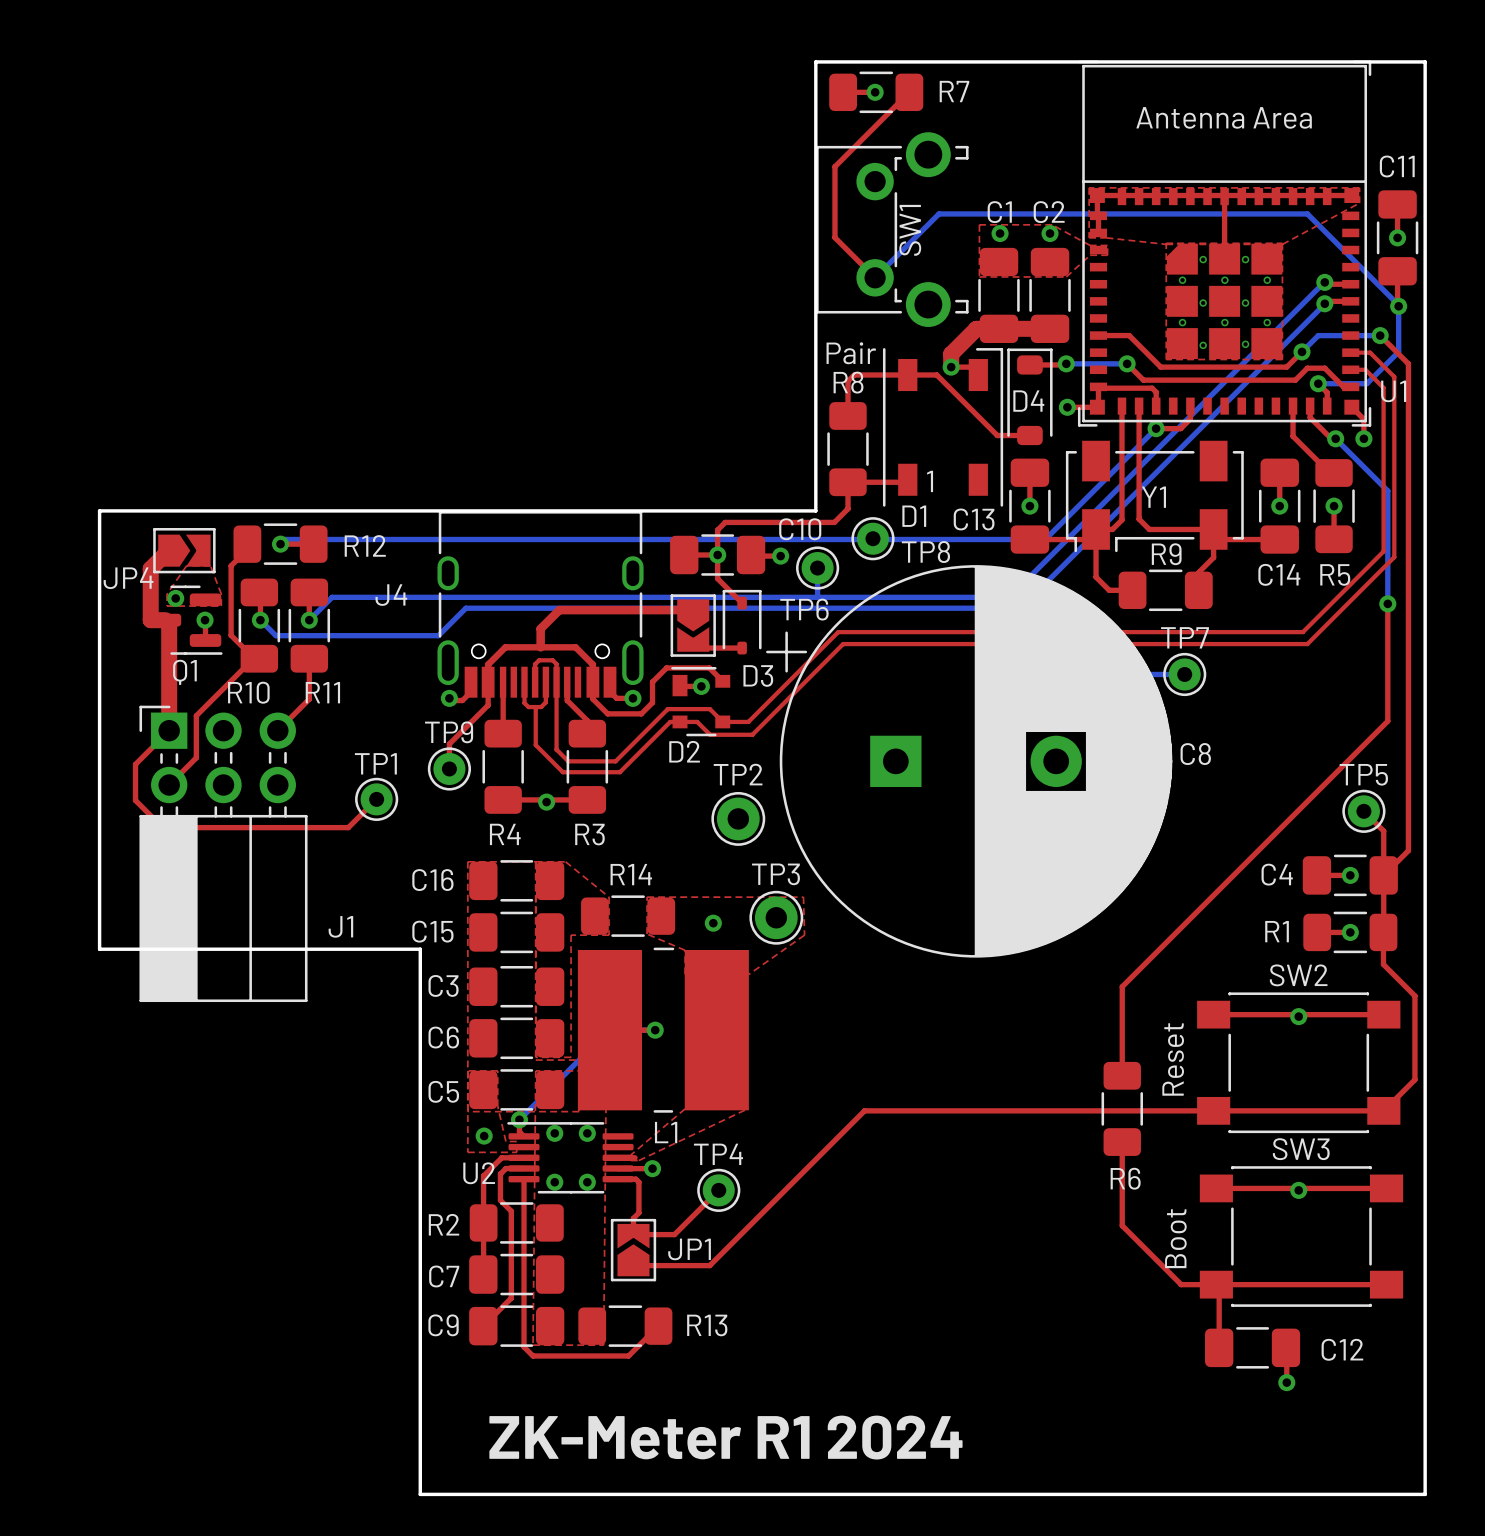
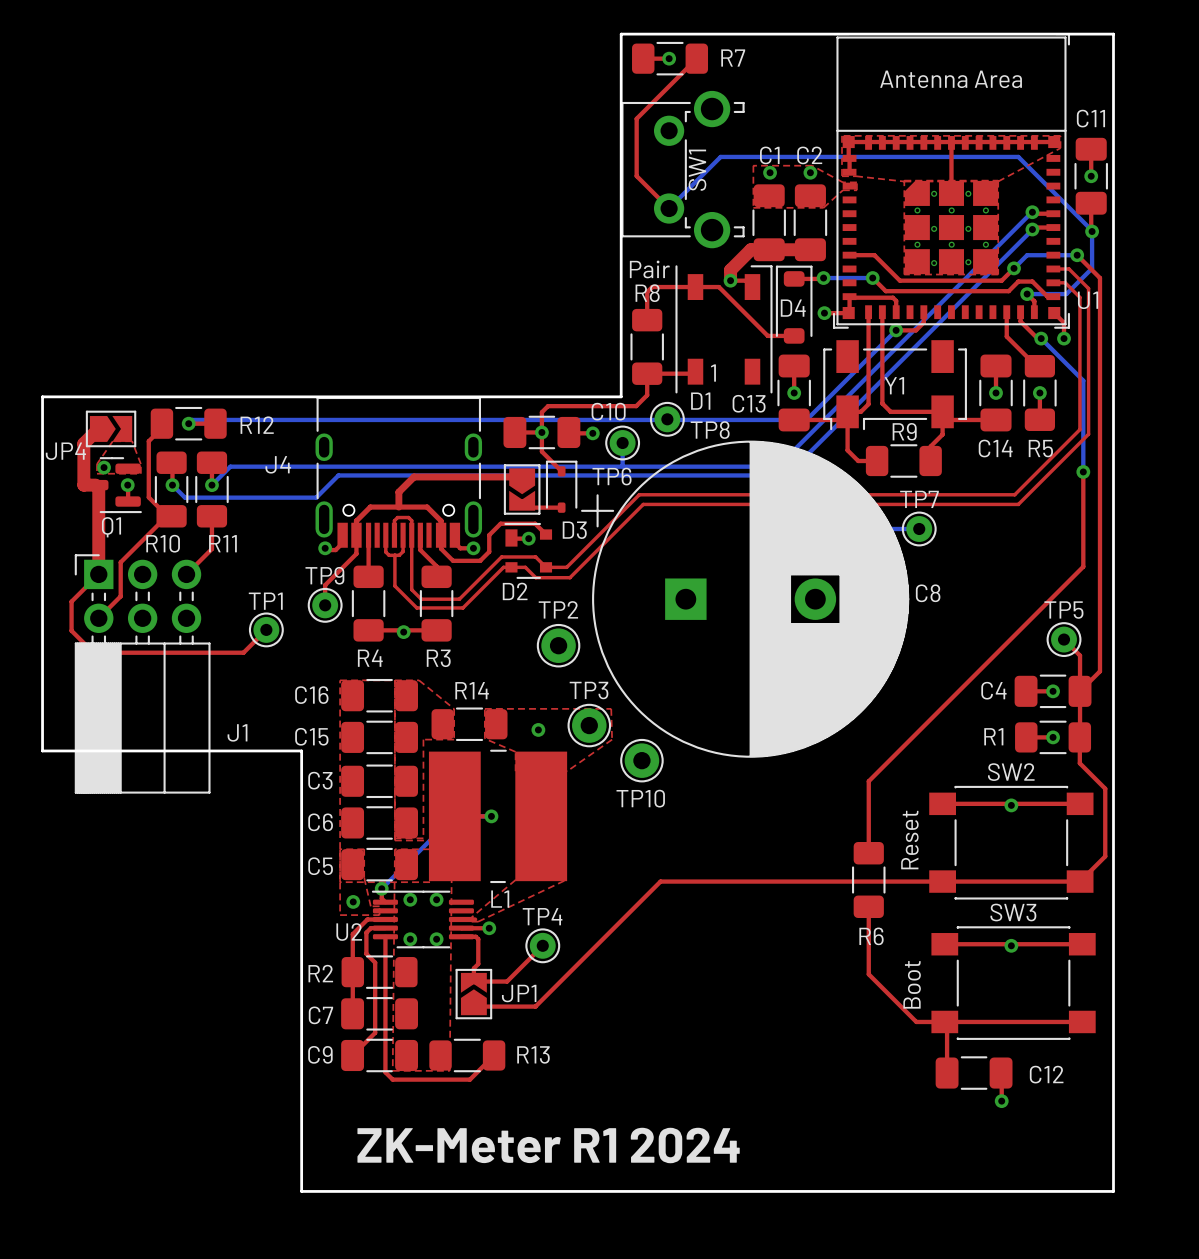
part: none -> (641, 760)
text: none -> TP10 (640, 798)

